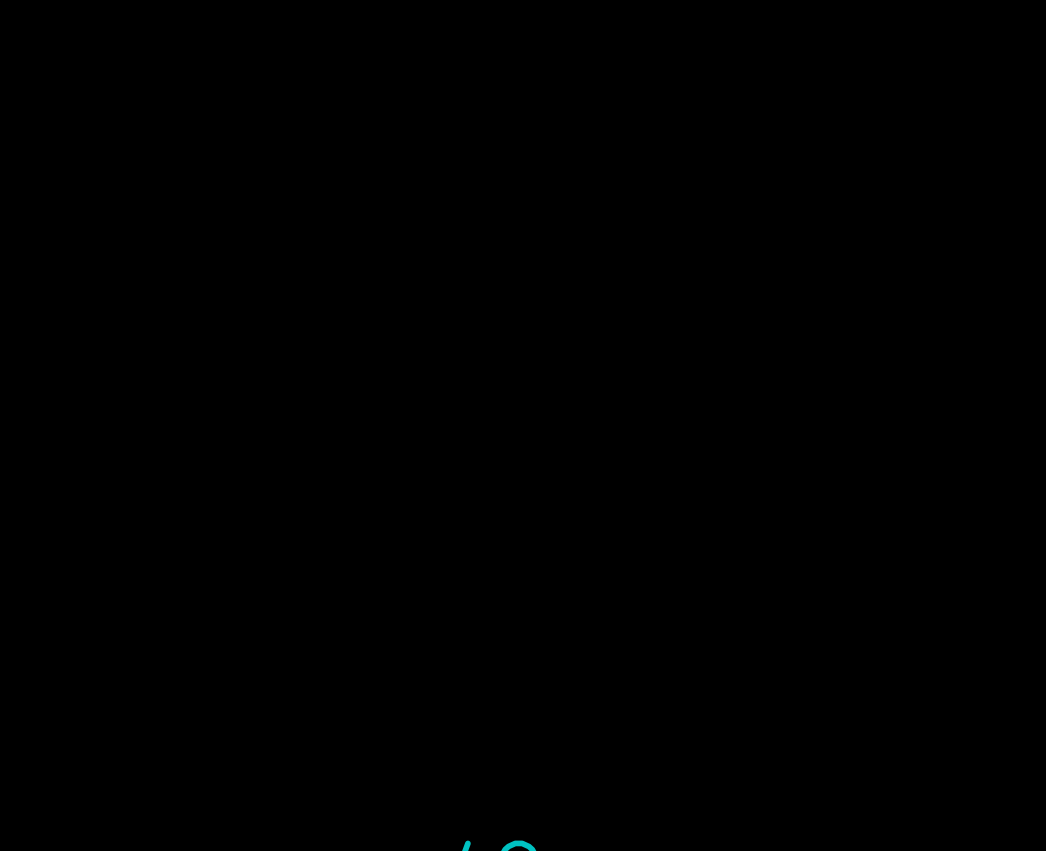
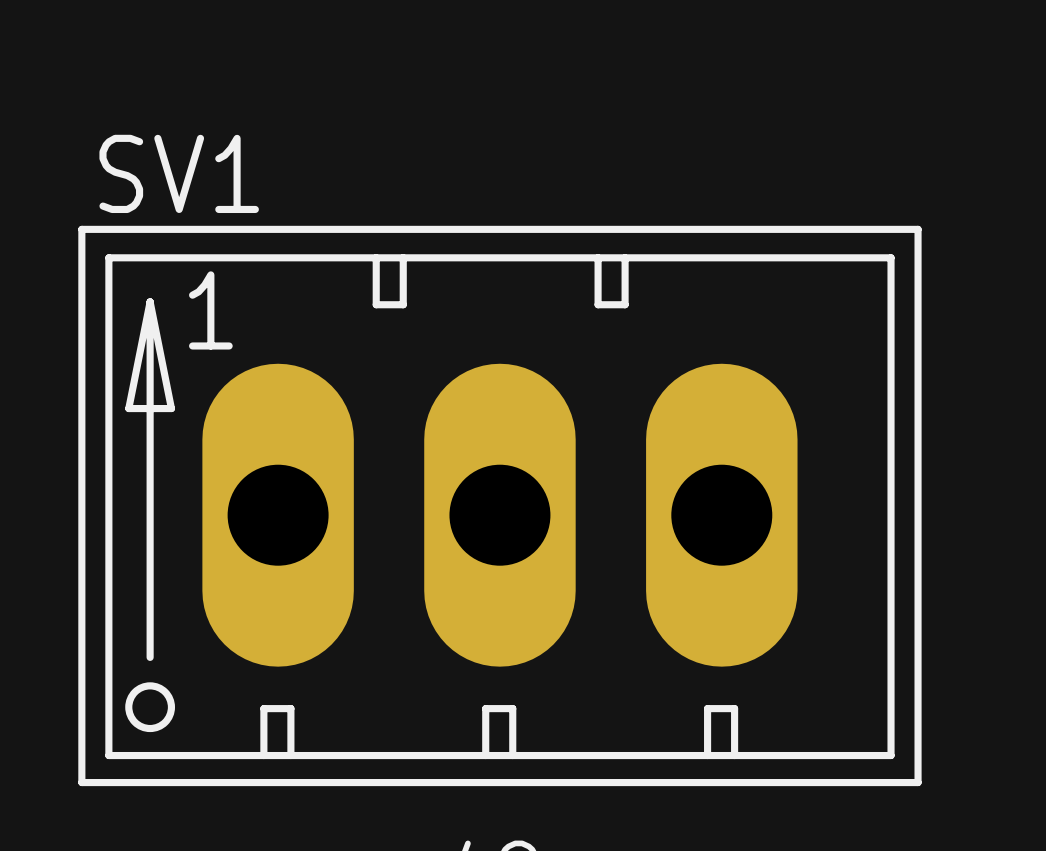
SV1: none -> (499, 505)

